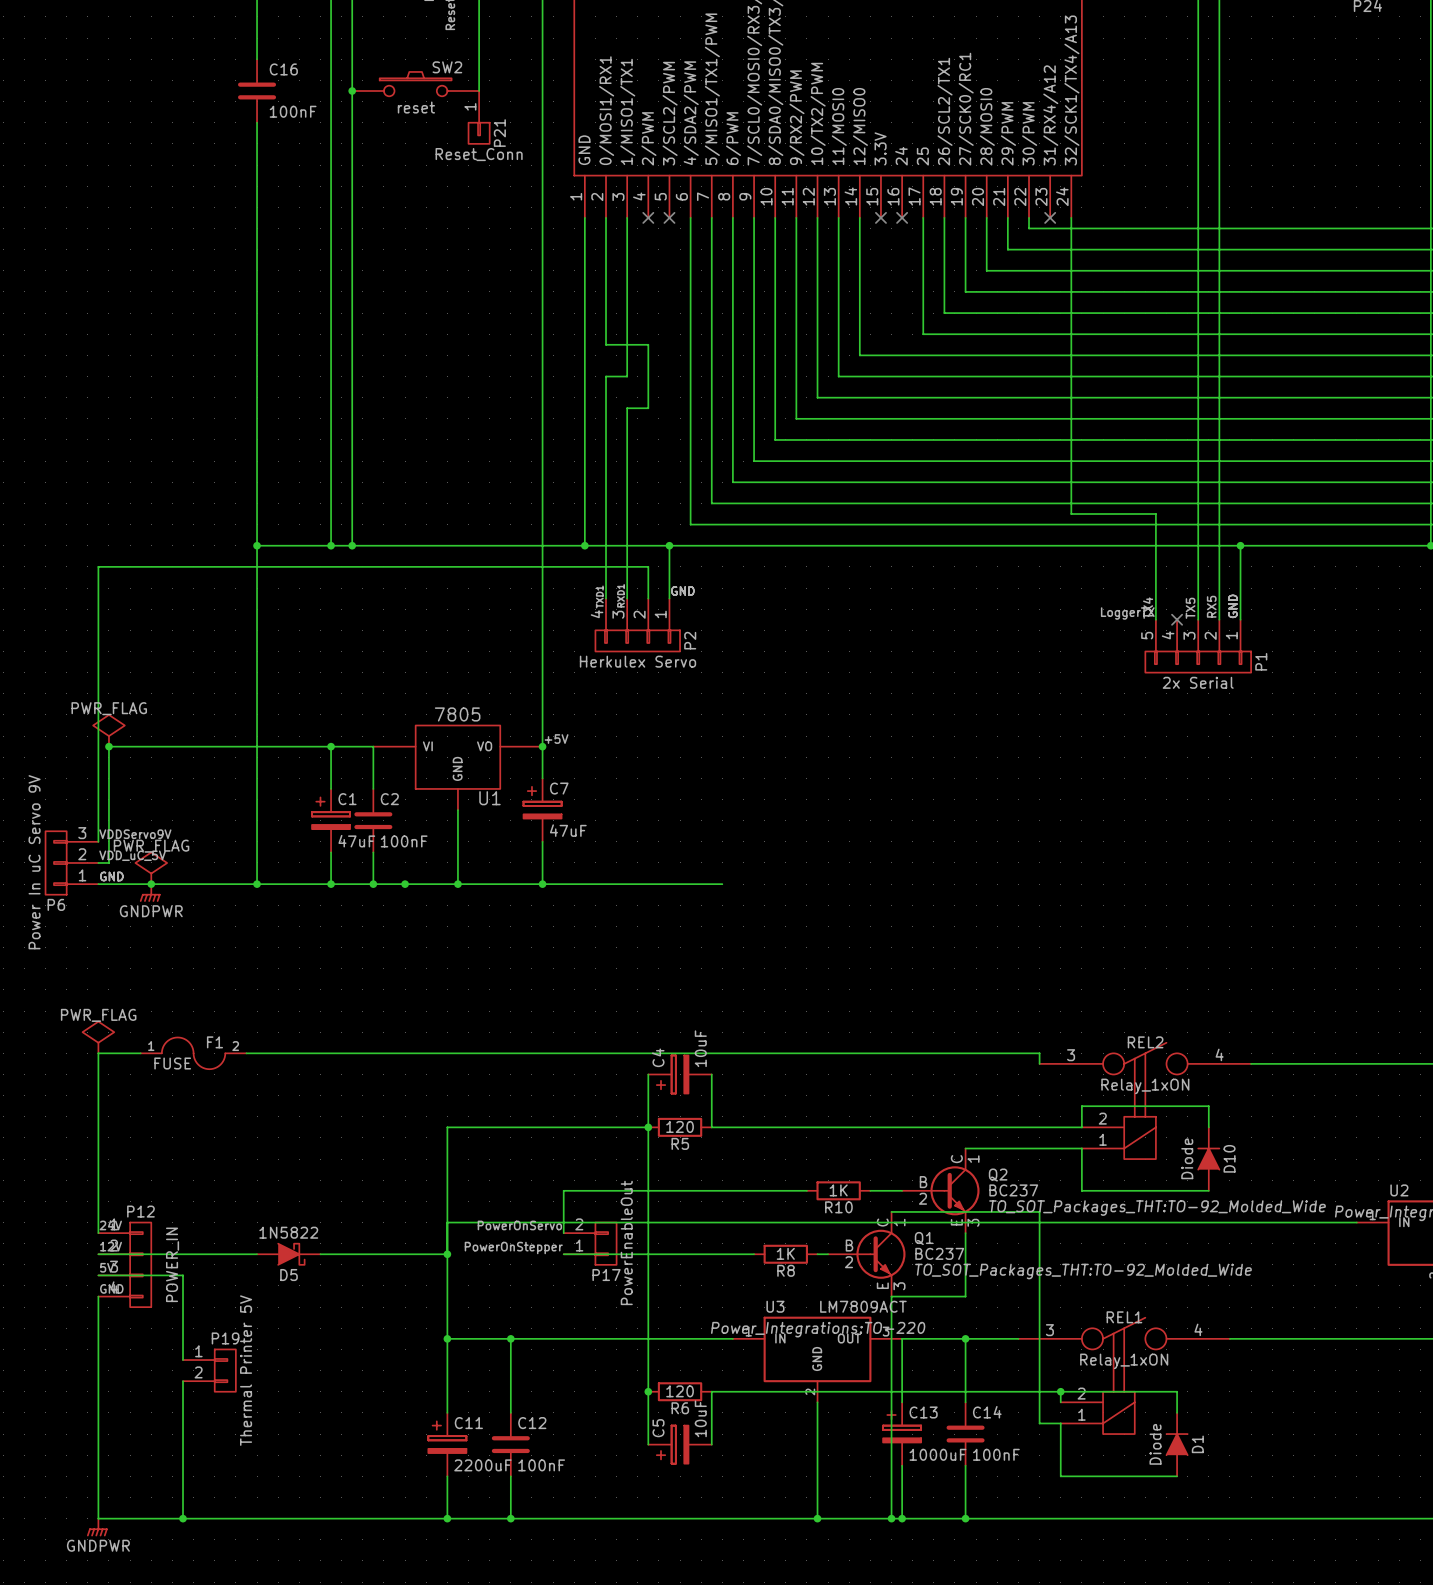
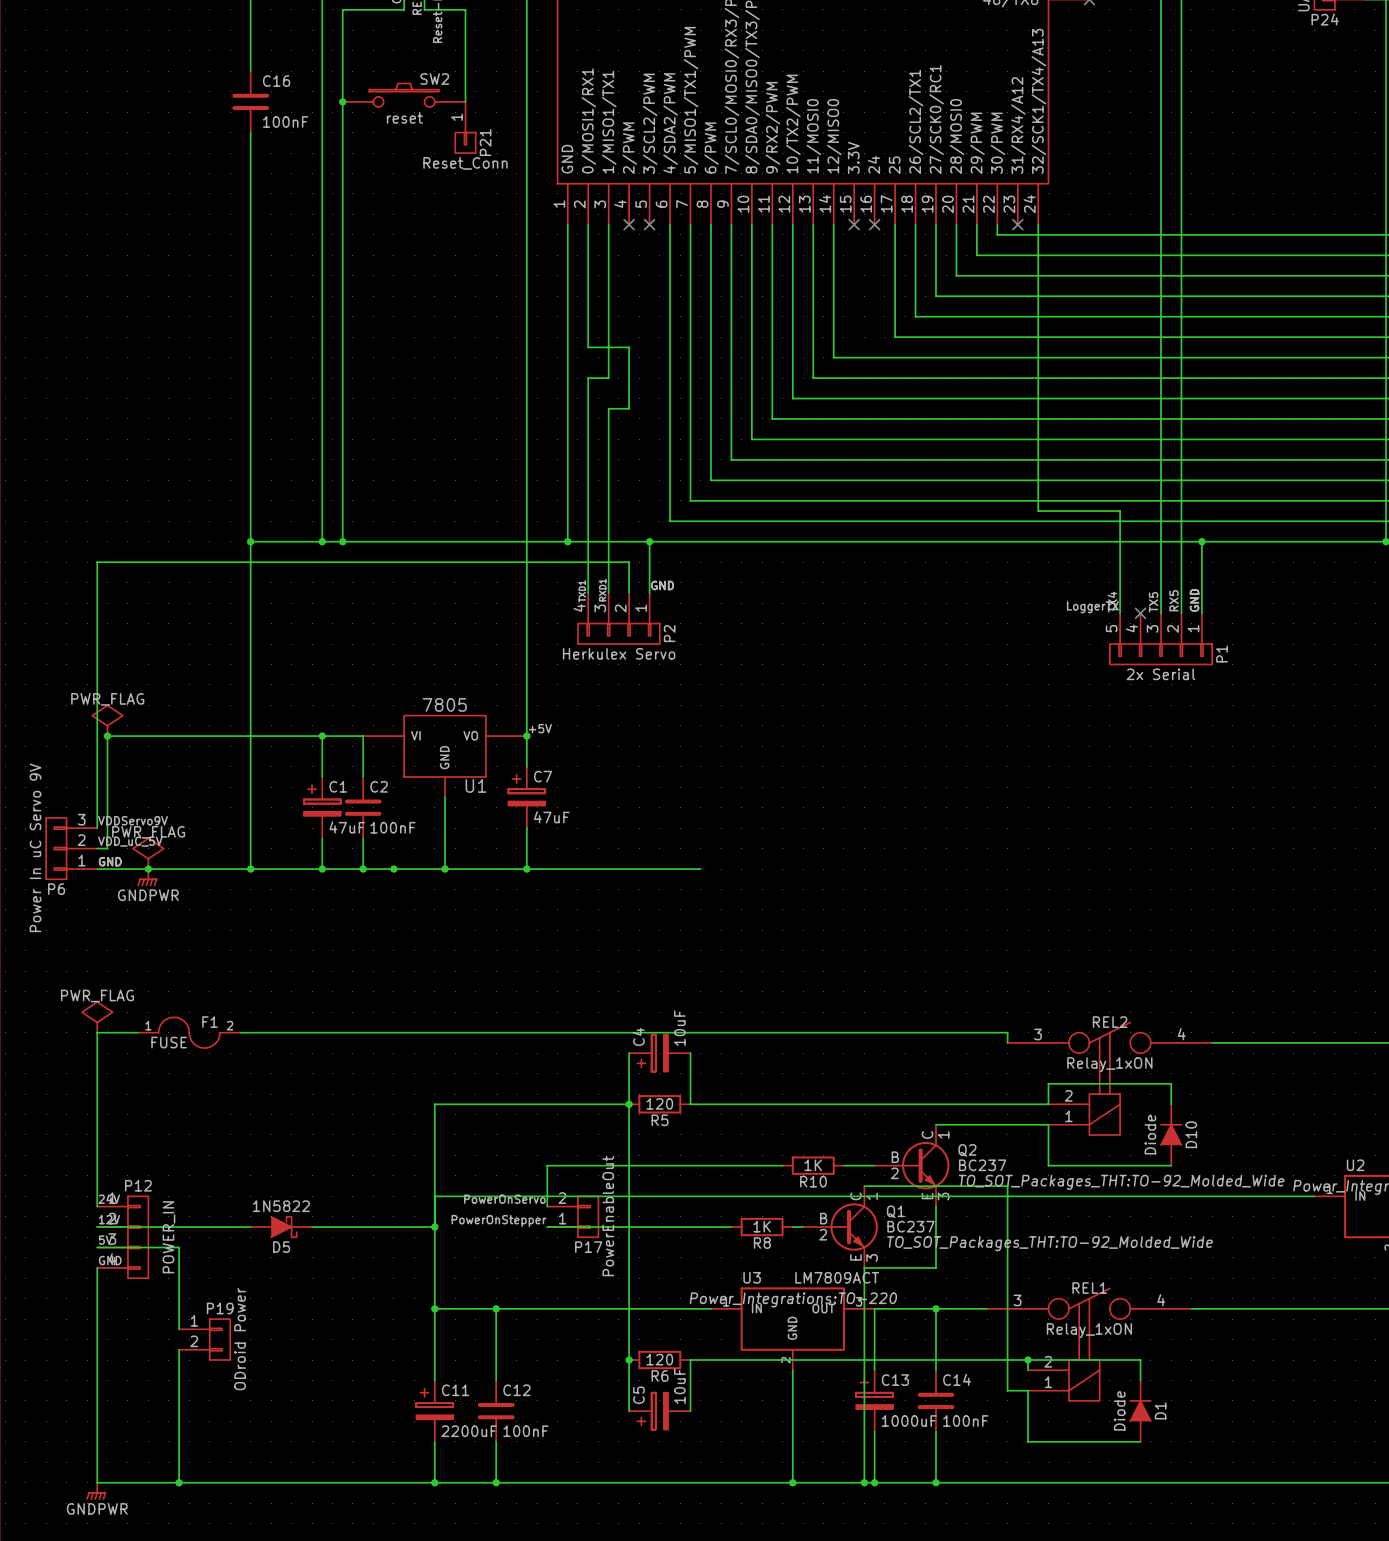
P19 value: Thermal Printer 5V (246, 1370) -> ODroid Power (240, 1339)

